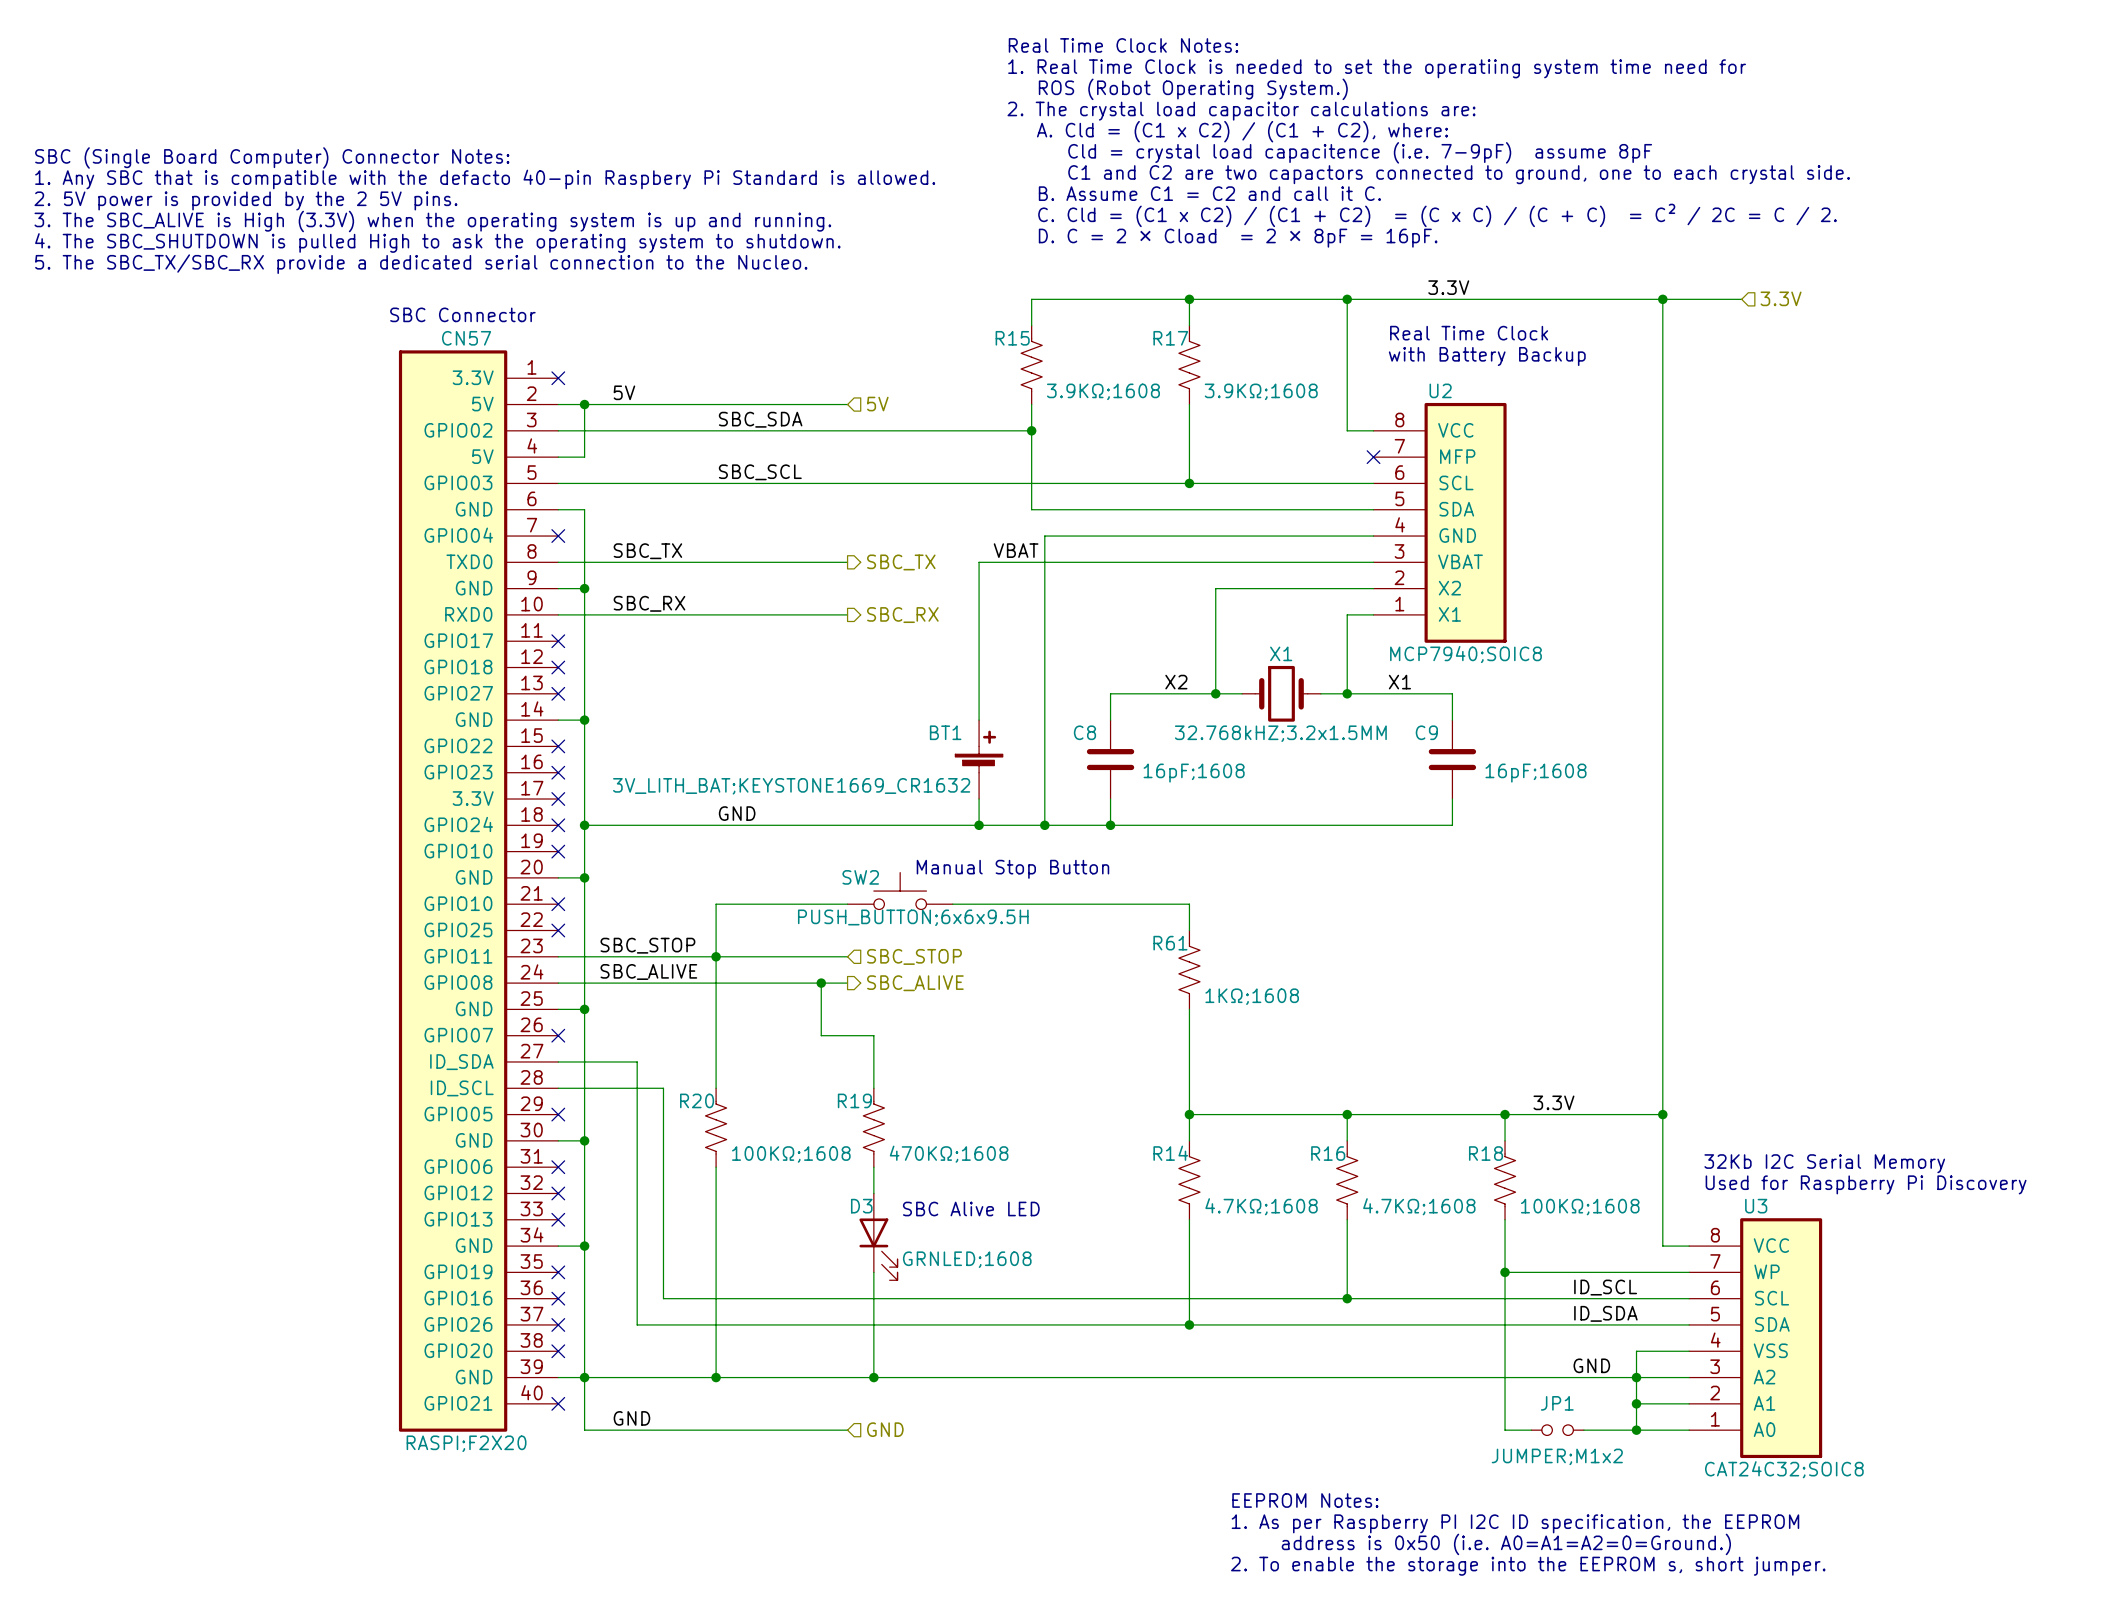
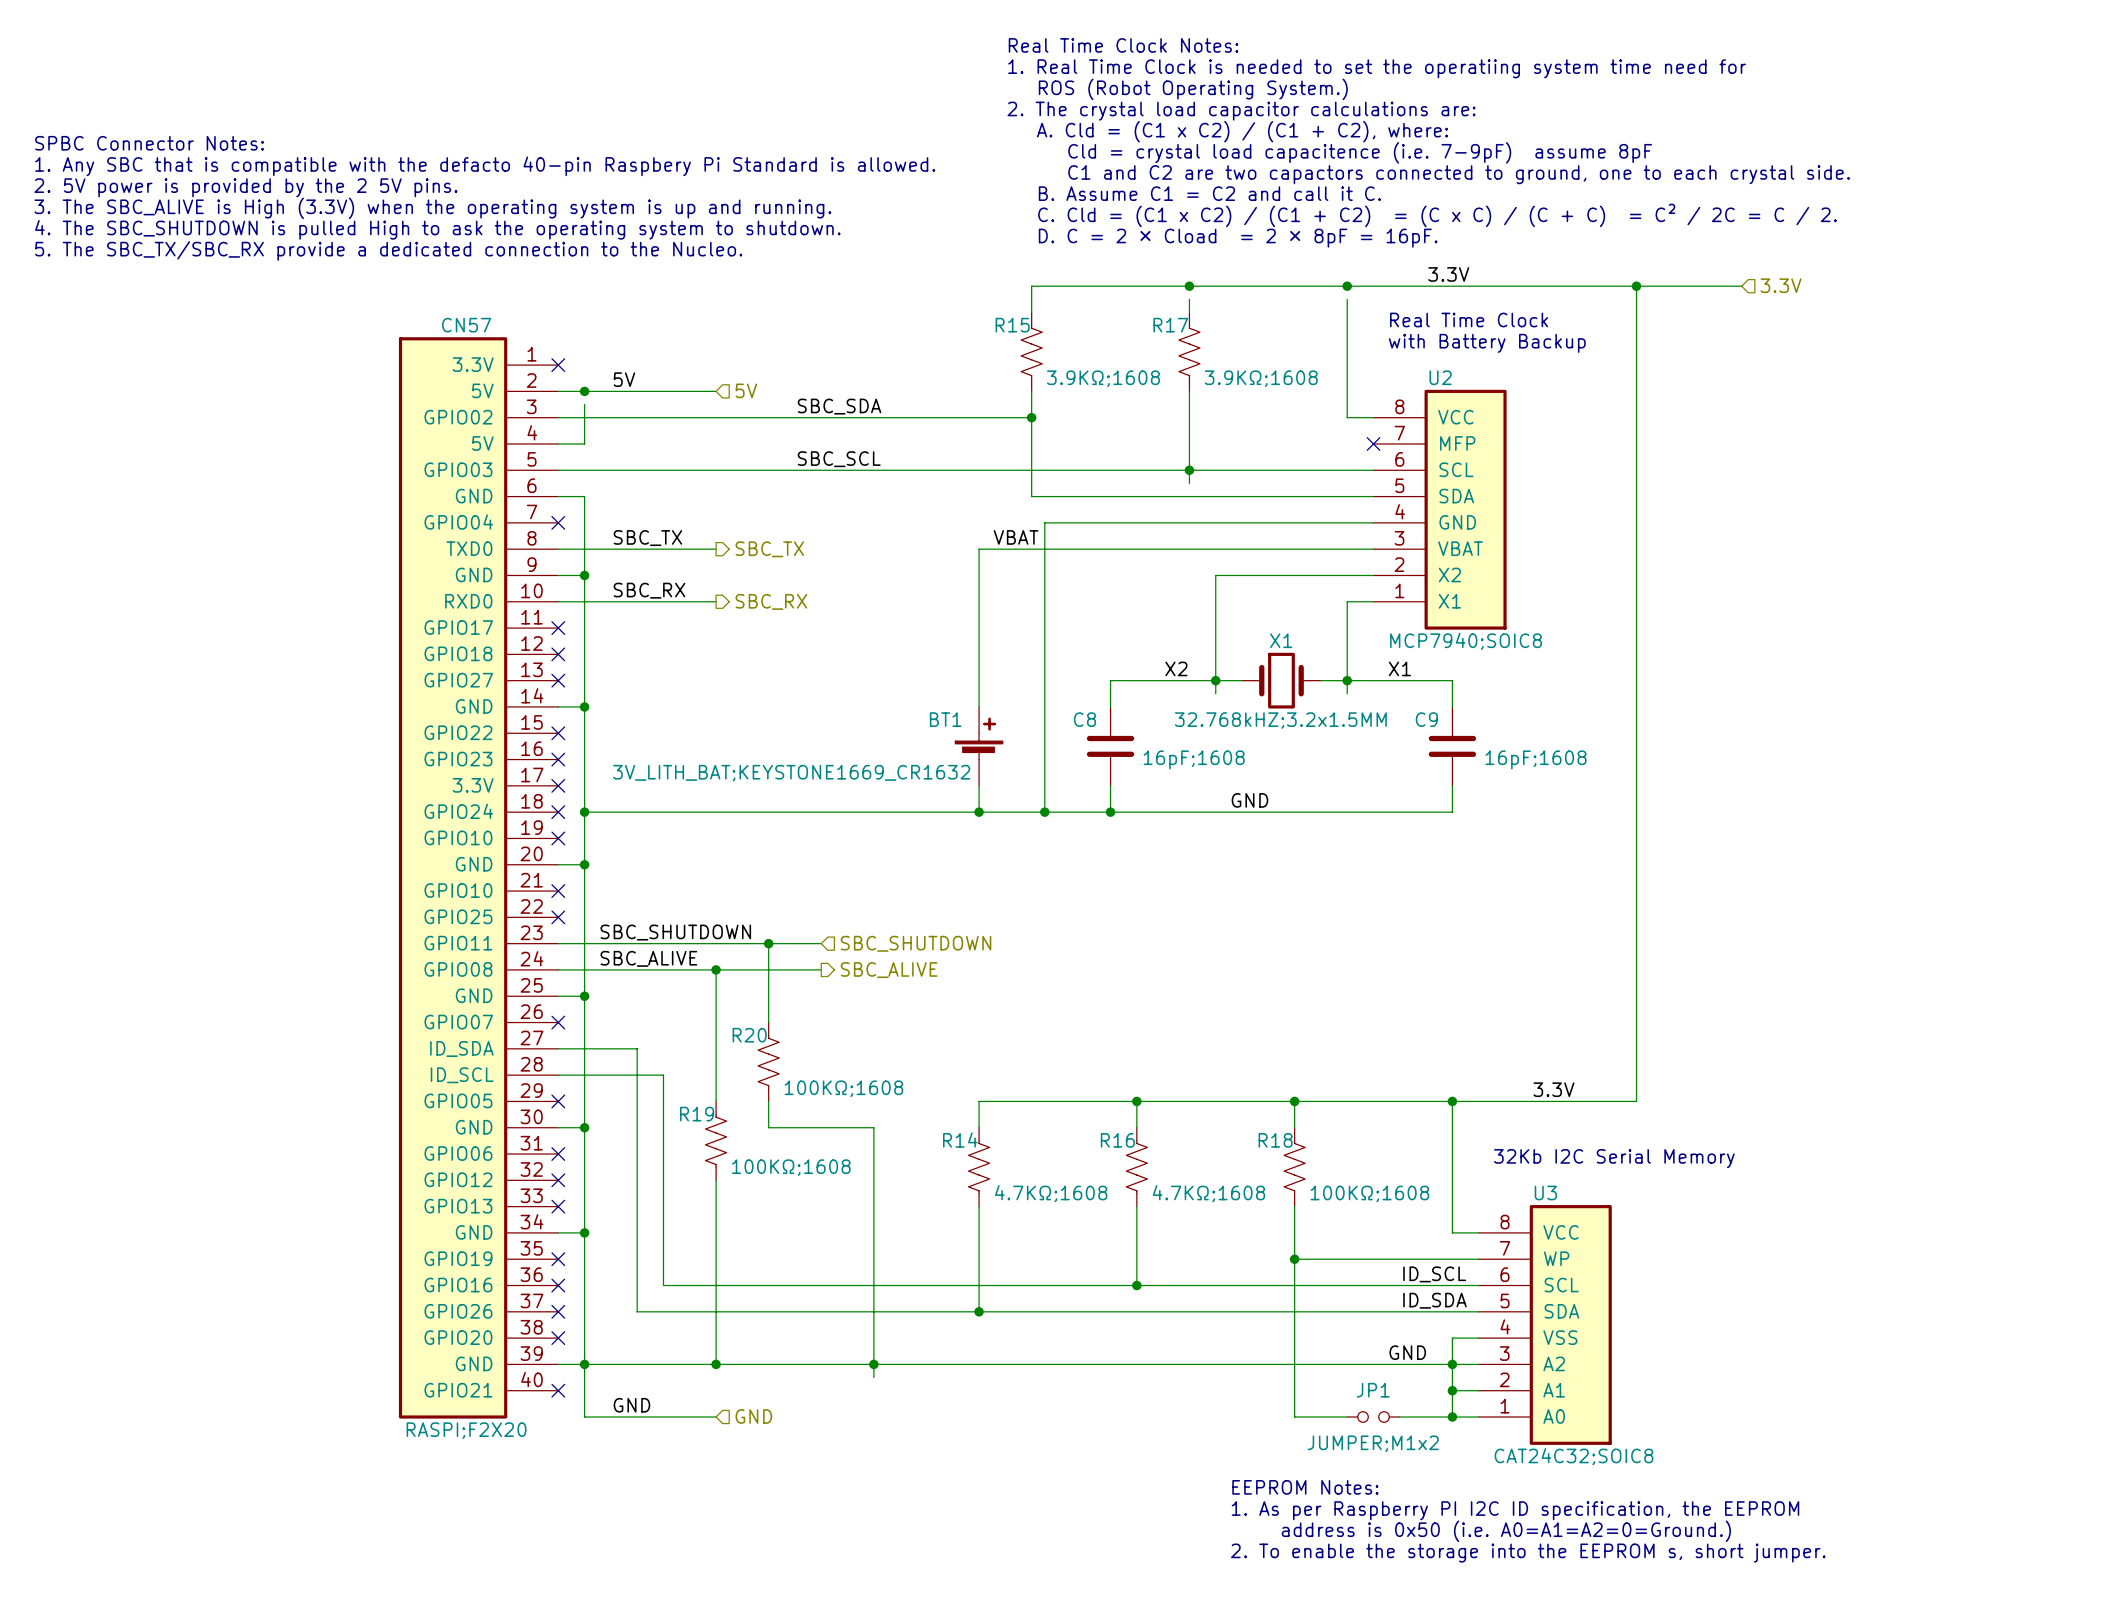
text: SBC (Single Board Computer) Connector Notes: (272, 157) -> SPBC Connector Notes: (149, 143)
text position: 1. Any SBC that is compatible with the defacto 40-pin Raspbery Pi Standard is allowed. (485, 179) -> 1. Any SBC that is compatible with the defacto 40-pin Raspbery Pi Standard is allowed. (485, 166)
text position: 2. 5V power is provided by the 2 5V pins. (245, 200) -> 2. 5V power is provided by the 2 5V pins. (245, 187)
text position: 3. The SBC_ALIVE is High (3.3V) when the operating system is up and running. (432, 221) -> 3. The SBC_ALIVE is High (3.3V) when the operating system is up and running. (432, 208)
text position: 4. The SBC_SHUTDOWN is pulled High to ask the operating system to shutdown. (437, 242) -> 4. The SBC_SHUTDOWN is pulled High to ask the operating system to shutdown. (437, 229)
text: 5. The SBC_TX/SBC_RX provide a dedicated serial connection to the Nucleo. (421, 264) -> 5. The SBC_TX/SBC_RX provide a dedicated connection to the Nucleo. (388, 251)
wire: none -> (1636, 286) (1636, 1101) (979, 1101) (979, 1127)
label position: 3.3V (1448, 287) -> 3.3V (1448, 274)
hierarchical label position: 3.3V (1781, 298) -> 3.3V (1781, 285)
wire: (1031, 299) (1741, 299) -> (1031, 299) (1031, 286) (1741, 286)
junction position: (1189, 299) -> (1189, 286)
junction position: (1347, 299) -> (1347, 286)
wire: (1662, 299) (1662, 1246) (1689, 1246) -> none
junction position: (1662, 299) -> (1636, 286)
text: SBC Connector (462, 314) -> none
text position: Real Time Clock (1469, 333) -> Real Time Clock (1469, 320)
text position: with Battery Backup (1487, 356) -> with Battery Backup (1487, 343)
R15 position: (1031, 365) -> (1031, 351)
R17 position: (1189, 365) -> (1189, 351)
no-connect mark position: (558, 378) -> (558, 365)
wire: none -> (558, 391) (716, 391)
label position: 5V (624, 392) -> 5V (624, 379)
wire: (558, 404) (847, 404) -> none
junction position: (584, 404) -> (584, 391)
hierarchical label position: 5V (877, 404) -> 5V (746, 390)
wire: (1347, 417) (1347, 430) (1373, 430) -> (1347, 417) (1373, 417)
label position: SBC_SDA (760, 419) -> SBC_SDA (839, 406)
wire: (558, 430) (1031, 430) -> (558, 417) (1031, 417)
junction position: (1031, 430) -> (1031, 417)
wire: (584, 443) (584, 457) (558, 457) -> (584, 443) (558, 443)
no-connect mark position: (1373, 457) -> (1373, 443)
label position: SBC_SCL (760, 472) -> SBC_SCL (839, 459)
wire: (558, 483) (1373, 483) -> (558, 470) (1373, 470)
junction position: (1189, 483) -> (1189, 470)
wire: (1031, 496) (1031, 509) (1373, 509) -> (1031, 496) (1373, 496)
wire: (558, 509) (584, 509) -> (558, 496) (584, 496) (584, 509)
U2 position: (1440, 522) -> (1440, 509)
no-connect mark position: (558, 536) -> (558, 522)
wire: (1044, 536) (1373, 536) -> (1044, 536) (1044, 522) (1373, 522)
wire: none -> (558, 549) (716, 549)
label position: VBAT (1016, 550) -> VBAT (1016, 537)
label position: SBC_TX (647, 551) -> SBC_TX (647, 538)
wire: (558, 562) (847, 562) -> none
hierarchical label position: SBC_TX (901, 562) -> SBC_TX (769, 549)
wire: (979, 562) (1373, 562) -> (979, 562) (979, 549) (1373, 549)
wire: (558, 588) (584, 588) -> (558, 575) (584, 575)
junction position: (584, 588) -> (584, 575)
wire: (1215, 588) (1373, 588) -> (1215, 588) (1215, 575) (1373, 575)
wire: none -> (558, 601) (716, 601)
label position: SBC_RX (649, 603) -> SBC_RX (649, 590)
wire: (558, 614) (847, 614) -> none
wire: (1347, 614) (1373, 614) -> (1347, 614) (1347, 601) (1373, 601)
hierarchical label position: SBC_RX (902, 615) -> SBC_RX (771, 601)
no-connect mark: none -> (558, 628)
no-connect mark: (558, 641) -> none
no-connect mark: none -> (558, 654)
no-connect mark: (558, 667) -> none
no-connect mark: none -> (558, 680)
label position: X2 (1176, 682) -> X2 (1176, 668)
label position: X1 (1399, 682) -> X1 (1399, 668)
no-connect mark: (558, 693) -> none
wire: (1110, 693) (1242, 693) -> (1110, 693) (1110, 680) (1242, 680)
junction position: (1215, 693) -> (1215, 680)
X1 position: (1281, 693) -> (1281, 680)
wire: (1320, 693) (1452, 693) -> (1320, 680) (1452, 680) (1452, 693)
junction position: (1347, 693) -> (1347, 680)
wire: (558, 720) (584, 720) -> (558, 706) (584, 706)
junction position: (584, 720) -> (584, 706)
no-connect mark: none -> (558, 733)
no-connect mark: (558, 746) -> none
no-connect mark: none -> (558, 759)
BT1 position: (979, 759) -> (979, 746)
C8 position: (1110, 759) -> (1110, 746)
C9 position: (1452, 759) -> (1452, 746)
no-connect mark: (558, 772) -> none
no-connect mark: none -> (558, 785)
no-connect mark: (558, 799) -> none
label: none -> GND (1249, 800)
no-connect mark: none -> (558, 812)
wire: (979, 812) (979, 825) -> none
wire: (1044, 812) (1044, 825) -> none
wire: (1110, 812) (1110, 825) -> none
wire: (1452, 812) (1452, 825) (584, 825) -> (1452, 812) (584, 812)
label: GND (737, 813) -> none
no-connect mark: (558, 825) -> none
junction position: (584, 825) -> (584, 812)
junction position: (979, 825) -> (979, 812)
junction position: (1044, 825) -> (1044, 812)
junction position: (1110, 825) -> (1110, 812)
no-connect mark: none -> (558, 838)
no-connect mark: (558, 851) -> none
text: Manual Stop Button (1012, 869) -> none
wire: (558, 877) (584, 877) -> (558, 864) (584, 864)
junction position: (584, 877) -> (584, 864)
CN57 position: (478, 891) -> (478, 877)
no-connect mark: none -> (558, 891)
SW2: PUSH_BUTTON;6x6x9.5H (900, 891) -> none
no-connect mark: (558, 904) -> none
wire: (847, 904) (716, 904) (716, 969) -> none
wire: (952, 904) (1189, 904) (1189, 930) -> none
no-connect mark: none -> (558, 917)
no-connect mark: (558, 930) -> none
wire: none -> (558, 943) (821, 943)
wire: none -> (768, 943) (768, 1022)
junction: none -> (768, 943)
label: SBC_STOP (647, 945) -> SBC_SHUTDOWN (675, 932)
wire: (558, 956) (847, 956) -> none
junction position: (716, 956) -> (716, 969)
hierarchical label: SBC_STOP (914, 956) -> SBC_SHUTDOWN (916, 943)
wire: none -> (558, 969) (821, 969)
R61: 1KΩ;1608 (1189, 969) -> none
label position: SBC_ALIVE (648, 971) -> SBC_ALIVE (648, 958)
wire: (558, 983) (847, 983) -> none
wire: (821, 983) (821, 1035) (873, 1035) (873, 1088) -> none
junction: (821, 983) -> none
hierarchical label position: SBC_ALIVE (915, 983) -> SBC_ALIVE (889, 970)
wire: (558, 1009) (584, 1009) -> (558, 996) (584, 996)
junction position: (584, 1009) -> (584, 996)
wire: (1189, 1009) (1189, 1140) -> none
no-connect mark position: (558, 1035) -> (558, 1022)
wire: (558, 1061) (637, 1061) -> (558, 1048) (637, 1048) (637, 1061)
wire: (558, 1088) (663, 1088) -> (558, 1075) (663, 1075) (663, 1088)
wire: none -> (768, 1101) (768, 1127) (873, 1127) (873, 1167)
junction: none -> (1136, 1101)
junction: none -> (1294, 1101)
wire: none -> (1452, 1101) (1452, 1232) (1478, 1232)
junction: none -> (1452, 1101)
label position: 3.3V (1553, 1102) -> 3.3V (1553, 1089)
no-connect mark position: (558, 1114) -> (558, 1101)
wire: (1189, 1114) (1662, 1114) -> none
junction: (1189, 1114) -> none
wire: (1347, 1114) (1347, 1140) -> (1136, 1101) (1136, 1127)
junction: (1347, 1114) -> none
wire: (1505, 1114) (1505, 1140) -> (1294, 1101) (1294, 1127)
junction: (1505, 1114) -> none
junction: (1662, 1114) -> none
R20 position: (716, 1127) -> (768, 1061)
R19 position: (873, 1127) -> (716, 1140)
wire: (558, 1140) (584, 1140) -> (558, 1127) (584, 1127)
junction position: (584, 1140) -> (584, 1127)
no-connect mark: none -> (558, 1154)
R19 value: 470KΩ;1608 (949, 1154) -> 100KΩ;1608 (791, 1167)
text position: 32Kb I2C Serial Memory (1824, 1163) -> 32Kb I2C Serial Memory (1614, 1158)
no-connect mark: (558, 1167) -> none
no-connect mark: none -> (558, 1180)
R14 position: (1189, 1180) -> (979, 1167)
R16 position: (1347, 1180) -> (1136, 1167)
R18 position: (1505, 1180) -> (1294, 1167)
text: Used for Raspberry Pi Discovery (1866, 1184) -> none
no-connect mark: (558, 1193) -> none
no-connect mark: none -> (558, 1206)
wire: none -> (1294, 1206) (1294, 1417) (1347, 1417)
text: SBC Alive LED (971, 1209) -> none
no-connect mark: (558, 1219) -> none
wire: (1189, 1219) (1189, 1324) -> (979, 1206) (979, 1311)
wire: (1347, 1219) (1347, 1298) -> (1136, 1206) (1136, 1285)
wire: (1505, 1219) (1505, 1430) (1531, 1430) -> none
D3: GRNLED;1608 (878, 1236) -> none
wire: (558, 1246) (584, 1246) -> (558, 1232) (584, 1232)
junction position: (584, 1246) -> (584, 1232)
no-connect mark: none -> (558, 1259)
junction: none -> (1294, 1259)
no-connect mark: (558, 1272) -> none
wire: (1505, 1272) (1689, 1272) -> (1294, 1259) (1478, 1259)
junction: (1505, 1272) -> none
no-connect mark: none -> (558, 1285)
wire: (663, 1285) (663, 1298) (1689, 1298) -> (663, 1285) (1478, 1285)
junction: none -> (1136, 1285)
label position: ID_SCL (1605, 1287) -> ID_SCL (1434, 1274)
no-connect mark: (558, 1298) -> none
junction: (1347, 1298) -> none
no-connect mark: none -> (558, 1311)
wire: (637, 1311) (637, 1324) (1689, 1324) -> (637, 1311) (1478, 1311)
junction: none -> (979, 1311)
label position: ID_SDA (1605, 1313) -> ID_SDA (1434, 1300)
no-connect mark: (558, 1324) -> none
junction: (1189, 1324) -> none
no-connect mark: none -> (558, 1338)
wire: none -> (1478, 1338) (1452, 1338) (1452, 1417)
U3 position: (1755, 1338) -> (1545, 1324)
no-connect mark: (558, 1351) -> none
wire: (1689, 1351) (1636, 1351) (1636, 1430) -> none
wire: none -> (558, 1364) (1478, 1364)
wire: (716, 1364) (716, 1377) -> none
junction: none -> (1452, 1364)
label position: GND (1591, 1365) -> GND (1407, 1352)
wire: (558, 1377) (1689, 1377) -> none
junction position: (584, 1377) -> (584, 1364)
junction position: (716, 1377) -> (716, 1364)
junction position: (873, 1377) -> (873, 1364)
junction: (1636, 1377) -> none
wire: none -> (1452, 1390) (1478, 1390)
junction: none -> (1452, 1390)
no-connect mark position: (558, 1403) -> (558, 1390)
wire: (1636, 1403) (1689, 1403) -> none
junction: (1636, 1403) -> none
wire: (584, 1417) (584, 1430) (847, 1430) -> (584, 1417) (716, 1417)
wire: none -> (1399, 1417) (1478, 1417)
junction: none -> (1452, 1417)
label position: GND (631, 1418) -> GND (631, 1405)
hierarchical label position: GND (885, 1429) -> GND (753, 1416)
JP1 position: (1557, 1430) -> (1373, 1417)
wire: (1583, 1430) (1689, 1430) -> none
junction: (1636, 1430) -> none
text position: EEPROM Notes: (1305, 1500) -> EEPROM Notes: (1305, 1487)
text position: 1. As per Raspberry PI I2C ID specification, the EEPROM (1515, 1523) -> 1. As per Raspberry PI I2C ID specification, the EEPROM (1515, 1510)
text position: address is 0x50 (i.e. A0=A1=A2=0=Ground.) (1506, 1544) -> address is 0x50 (i.e. A0=A1=A2=0=Ground.) (1506, 1531)
text position: 2. To enable the storage into the EEPROM s, short jumper. (1528, 1566) -> 2. To enable the storage into the EEPROM s, short jumper. (1528, 1553)

